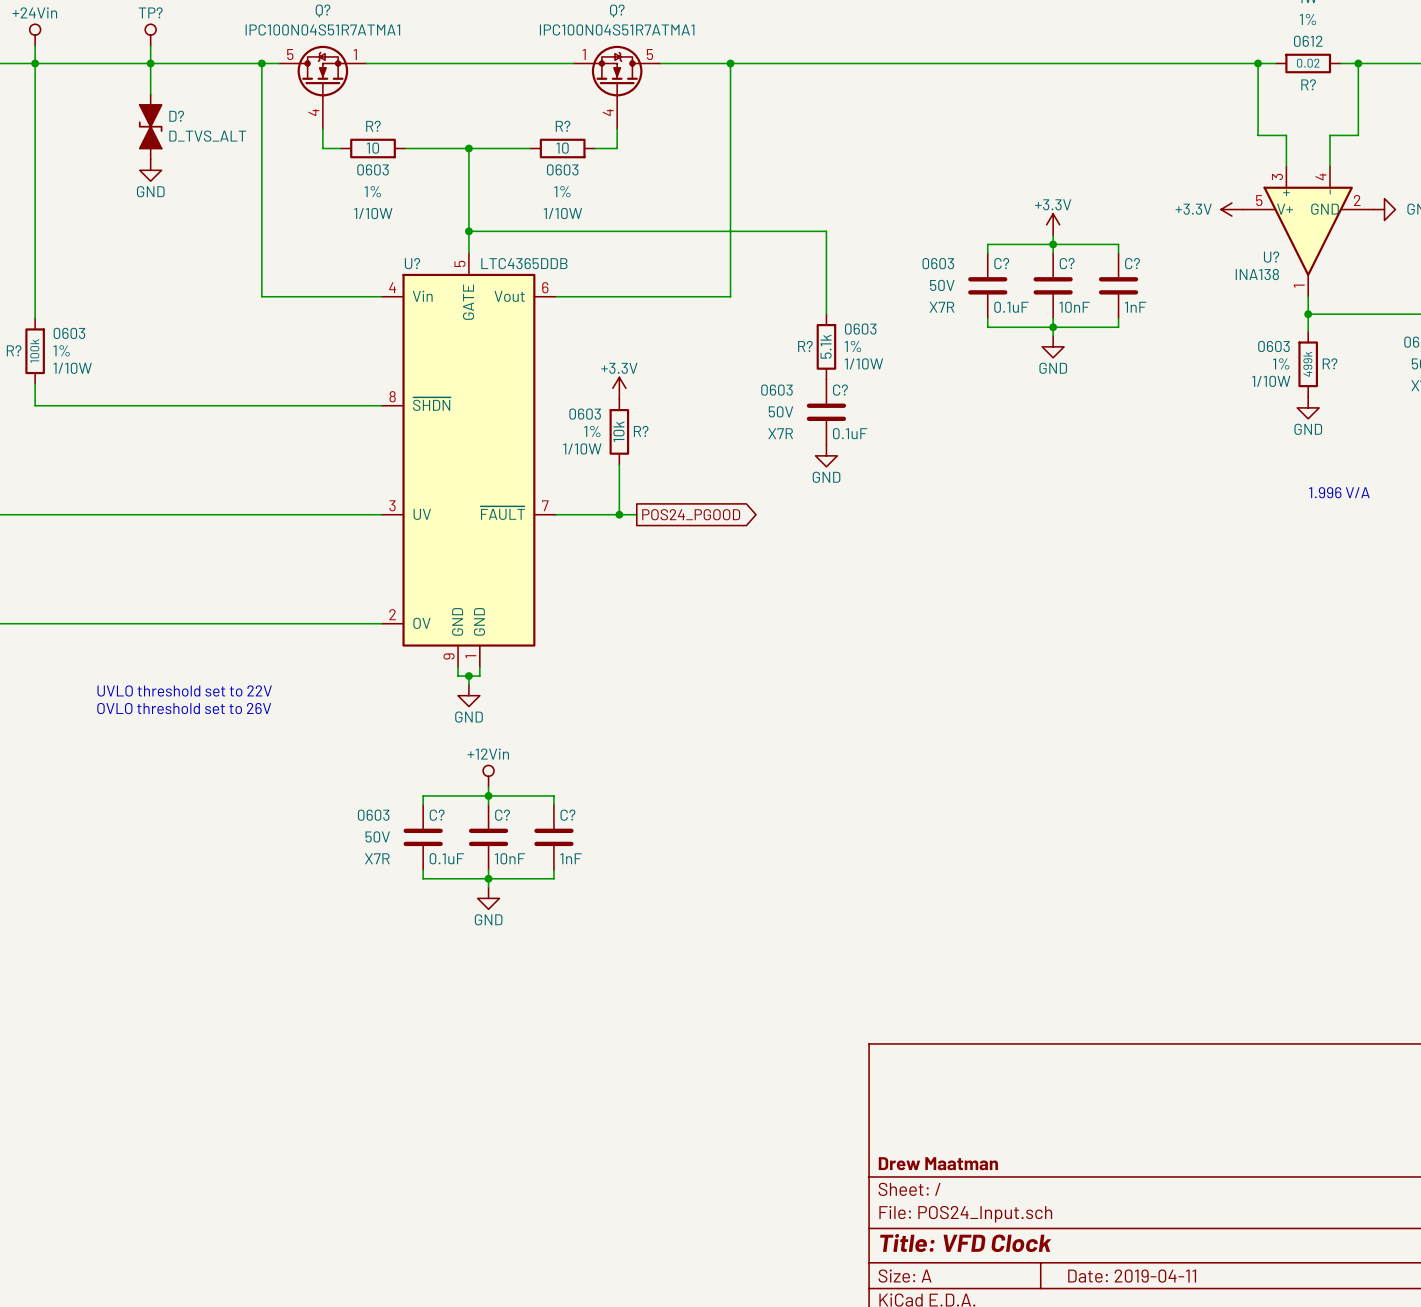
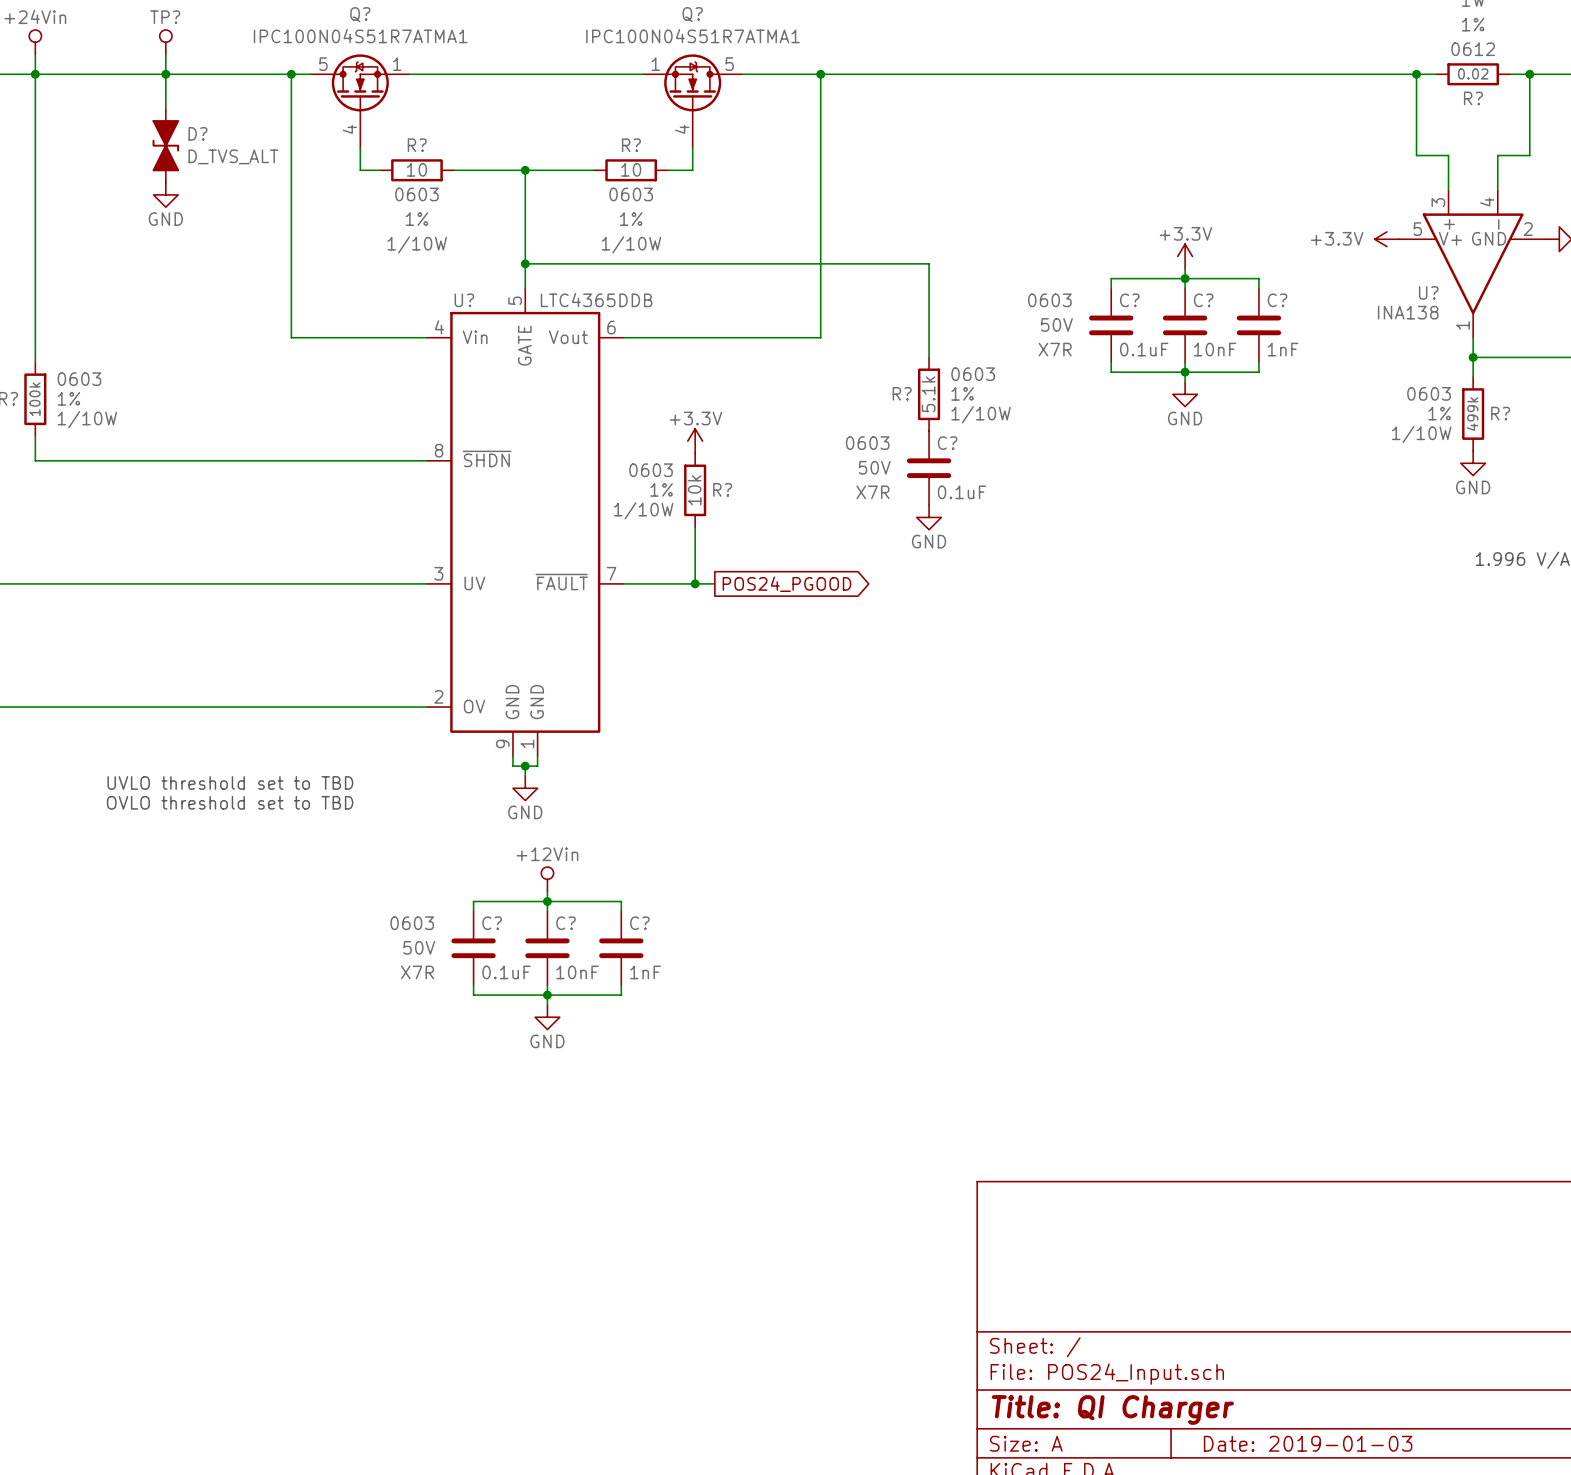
text: UVLO threshold set to 22V (184, 690) -> UVLO threshold set to TBD (230, 782)
text: OVLO threshold set to 26V (184, 708) -> OVLO threshold set to TBD (230, 802)
title block: Drew Maatman (938, 1163) -> none
title block: Title: VFD Clock (965, 1243) -> Title: QI Charger (1112, 1409)
title block: Date: 2019-04-11 (1132, 1276) -> Date: 2019-01-03 (1308, 1443)

